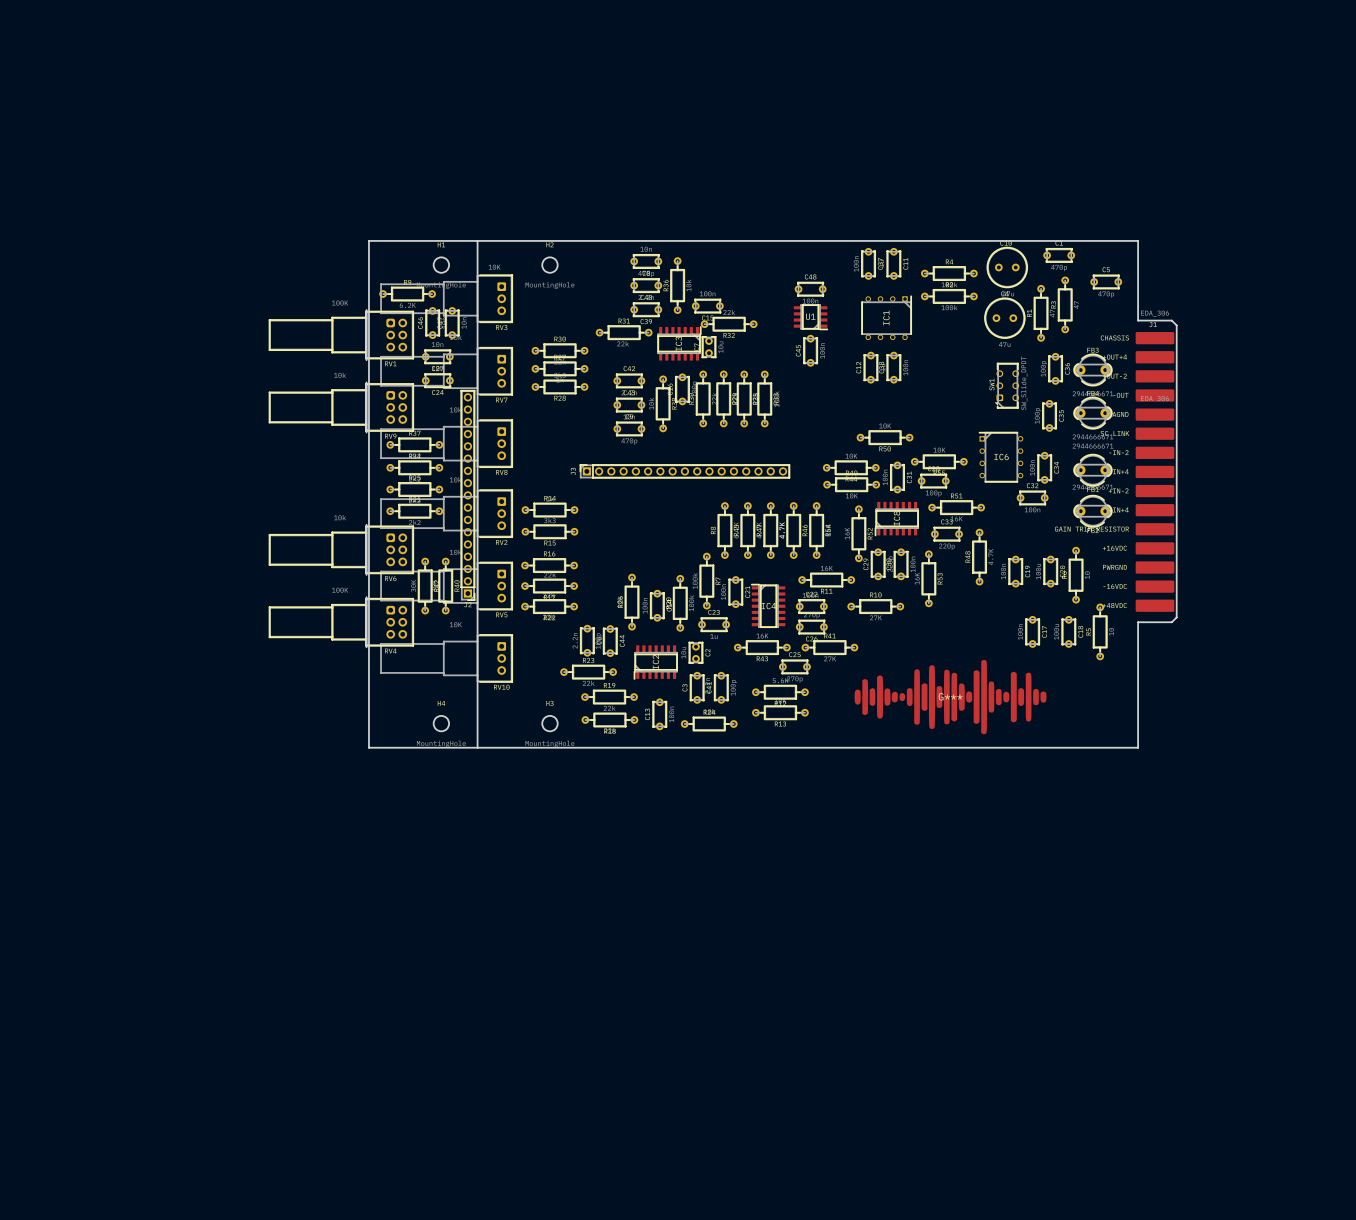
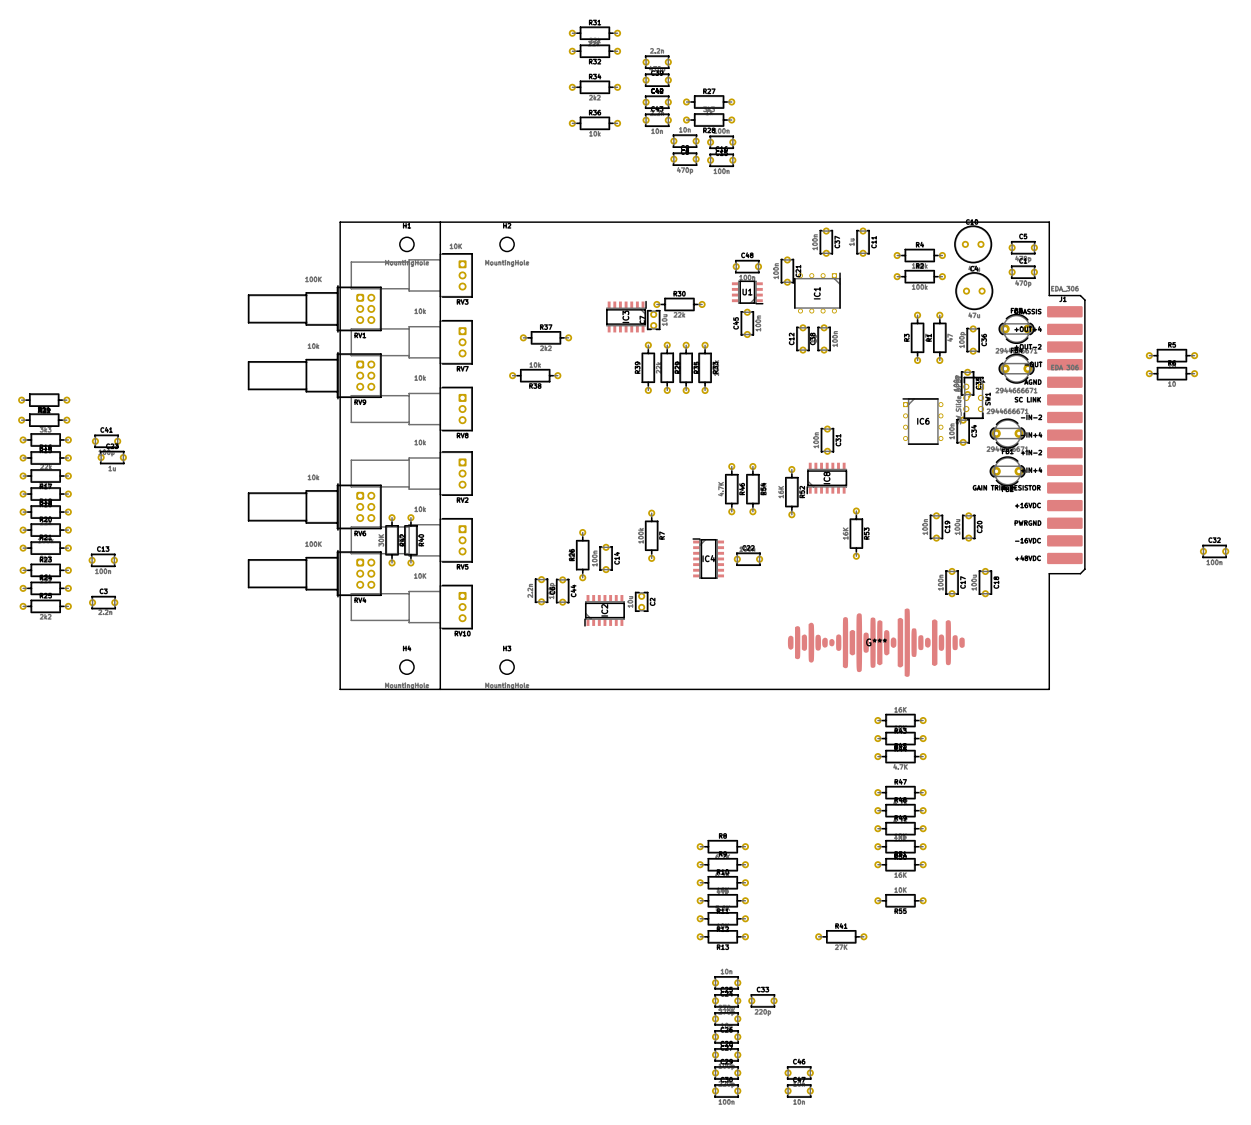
part position: (1059, 255) -> (1023, 272)
part position: (646, 261) -> (685, 141)
part position: (868, 263) -> (826, 242)
part position: (893, 263) -> (863, 242)
part position: (1007, 267) -> (973, 244)
part position: (949, 273) -> (919, 255)
part position: (1106, 281) -> (1023, 247)
part position: (646, 285) -> (657, 80)
part rotation: 0° (677, 285) -> 90° clockwise (594, 123)
part position: (677, 285) -> (594, 123)
part position: (407, 294) -> (722, 864)
part position: (949, 296) -> (919, 276)
part position: (1065, 304) -> (917, 337)
part position: (707, 306) -> (721, 142)
part position: (646, 309) -> (657, 62)
part position: (1041, 313) -> (939, 337)
part position: (1004, 318) -> (974, 291)
part rotation: 0° (432, 323) -> 90° clockwise (799, 1072)
part position: (432, 323) -> (799, 1072)
part rotation: 0° (452, 323) -> 90° clockwise (799, 1091)
part position: (452, 323) -> (799, 1091)
part position: (729, 324) -> (594, 51)
part position: (624, 332) -> (594, 33)
part position: (560, 350) -> (679, 304)
part position: (437, 356) -> (726, 1036)
part position: (560, 368) -> (709, 101)
part position: (1092, 370) -> (1016, 328)
part position: (437, 380) -> (726, 982)
part position: (629, 380) -> (657, 102)
part rotation: 0° (1007, 385) -> 180° (974, 397)
part position: (1007, 385) -> (974, 397)
part position: (560, 386) -> (709, 120)
part rotation: 0° (682, 389) -> 90° clockwise (721, 160)
part position: (682, 389) -> (721, 160)
part rotation: 0° (663, 403) -> 90° clockwise (535, 375)
part position: (663, 403) -> (535, 375)
part position: (629, 405) -> (657, 120)
part position: (1092, 413) -> (1016, 368)
part position: (629, 428) -> (685, 159)
part position: (885, 437) -> (900, 846)
part position: (414, 444) -> (545, 337)
part position: (939, 461) -> (900, 900)
part position: (414, 467) -> (594, 87)
part position: (851, 467) -> (900, 738)
part: (684, 471) -> none
part position: (933, 481) -> (726, 1054)
part position: (851, 484) -> (900, 828)
part position: (414, 489) -> (45, 606)
part: (467, 495) -> none
part position: (1032, 497) -> (1214, 551)
part position: (956, 507) -> (900, 864)
part position: (549, 510) -> (44, 420)
part position: (414, 511) -> (45, 548)
part rotation: 0° (724, 530) -> 90° clockwise (722, 846)
part position: (724, 530) -> (722, 846)
part rotation: 0° (747, 530) -> 90° clockwise (900, 756)
part position: (747, 530) -> (900, 756)
part rotation: 0° (770, 530) -> 90° clockwise (900, 792)
part position: (770, 530) -> (900, 792)
part position: (549, 531) -> (45, 439)
part position: (946, 534) -> (762, 1000)
part rotation: 0° (979, 557) -> 90° clockwise (900, 810)
part position: (979, 557) -> (900, 810)
part rotation: 0° (878, 564) -> 90° clockwise (726, 1072)
part position: (878, 564) -> (726, 1072)
part rotation: 0° (901, 564) -> 90° clockwise (726, 1091)
part position: (901, 564) -> (726, 1091)
part position: (549, 565) -> (45, 457)
part rotation: 0° (1076, 575) -> 90° clockwise (1171, 373)
part position: (1076, 575) -> (1171, 373)
part position: (826, 580) -> (722, 900)
part position: (549, 586) -> (45, 476)
part position: (735, 592) -> (787, 271)
part rotation: 0° (680, 603) -> 90° clockwise (45, 530)
part position: (680, 603) -> (45, 530)
part position: (549, 606) -> (44, 400)
part position: (875, 606) -> (722, 882)
part position: (714, 624) -> (112, 457)
part position: (811, 627) -> (726, 1018)
part rotation: 0° (1100, 631) -> 90° clockwise (1171, 355)
part position: (1100, 631) -> (1171, 355)
part position: (762, 647) -> (900, 720)
part position: (829, 647) -> (841, 936)
part position: (794, 666) -> (726, 1000)
part position: (588, 672) -> (45, 570)
part rotation: 0° (697, 687) -> 90° clockwise (103, 602)
part position: (697, 687) -> (103, 602)
part rotation: 0° (721, 687) -> 90° clockwise (106, 441)
part position: (721, 687) -> (106, 441)
part position: (780, 692) -> (722, 918)
part position: (609, 697) -> (45, 512)
part position: (780, 712) -> (722, 936)
part rotation: 0° (659, 714) -> 90° clockwise (103, 560)
part position: (659, 714) -> (103, 560)
part position: (609, 719) -> (45, 494)
part position: (709, 723) -> (45, 588)

